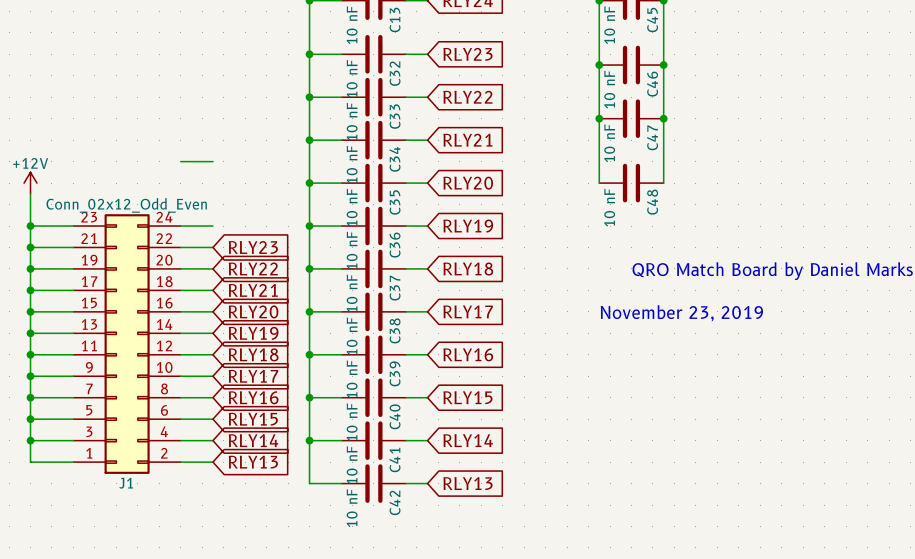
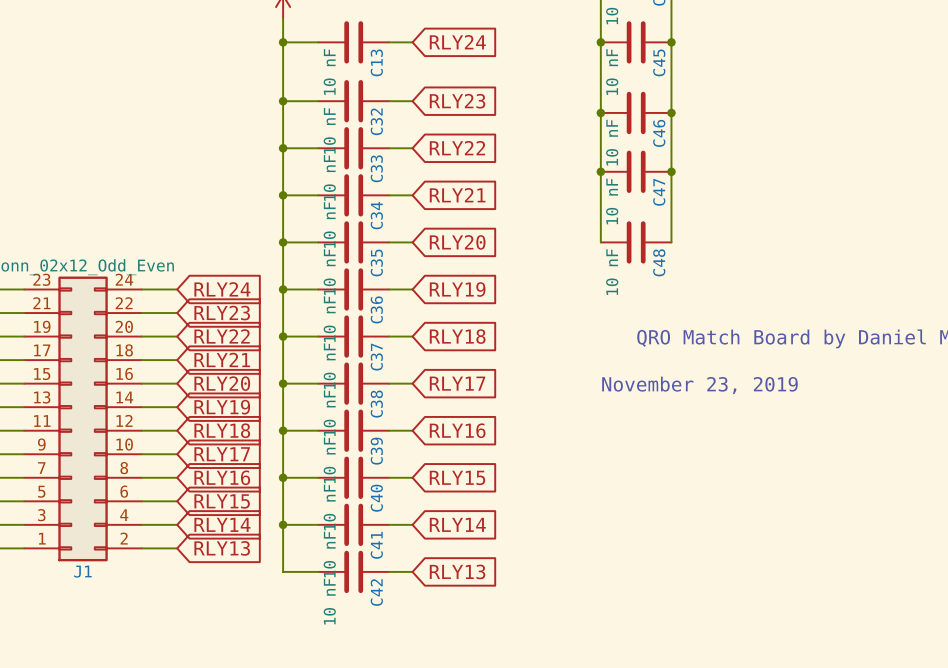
wire: (180, 161) (212, 161) -> none
global label: none -> RLY24 (222, 289)

